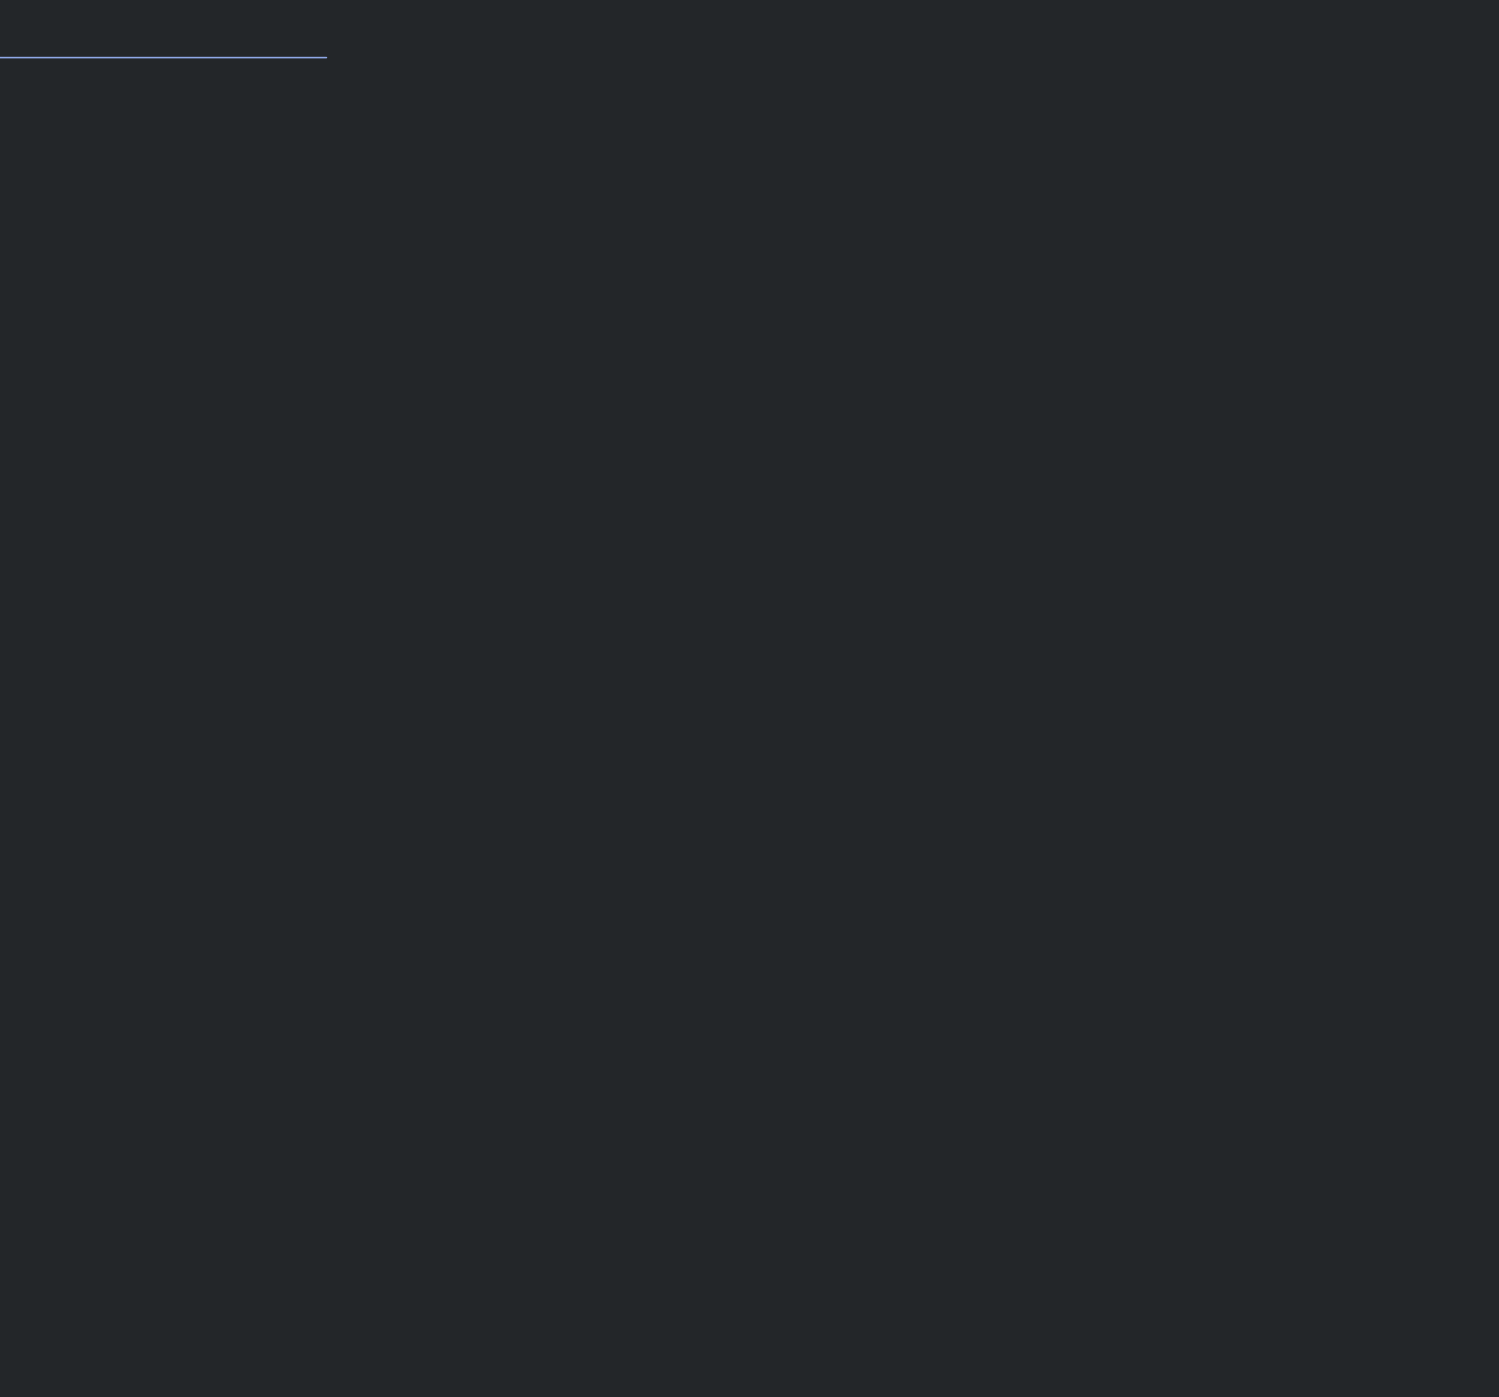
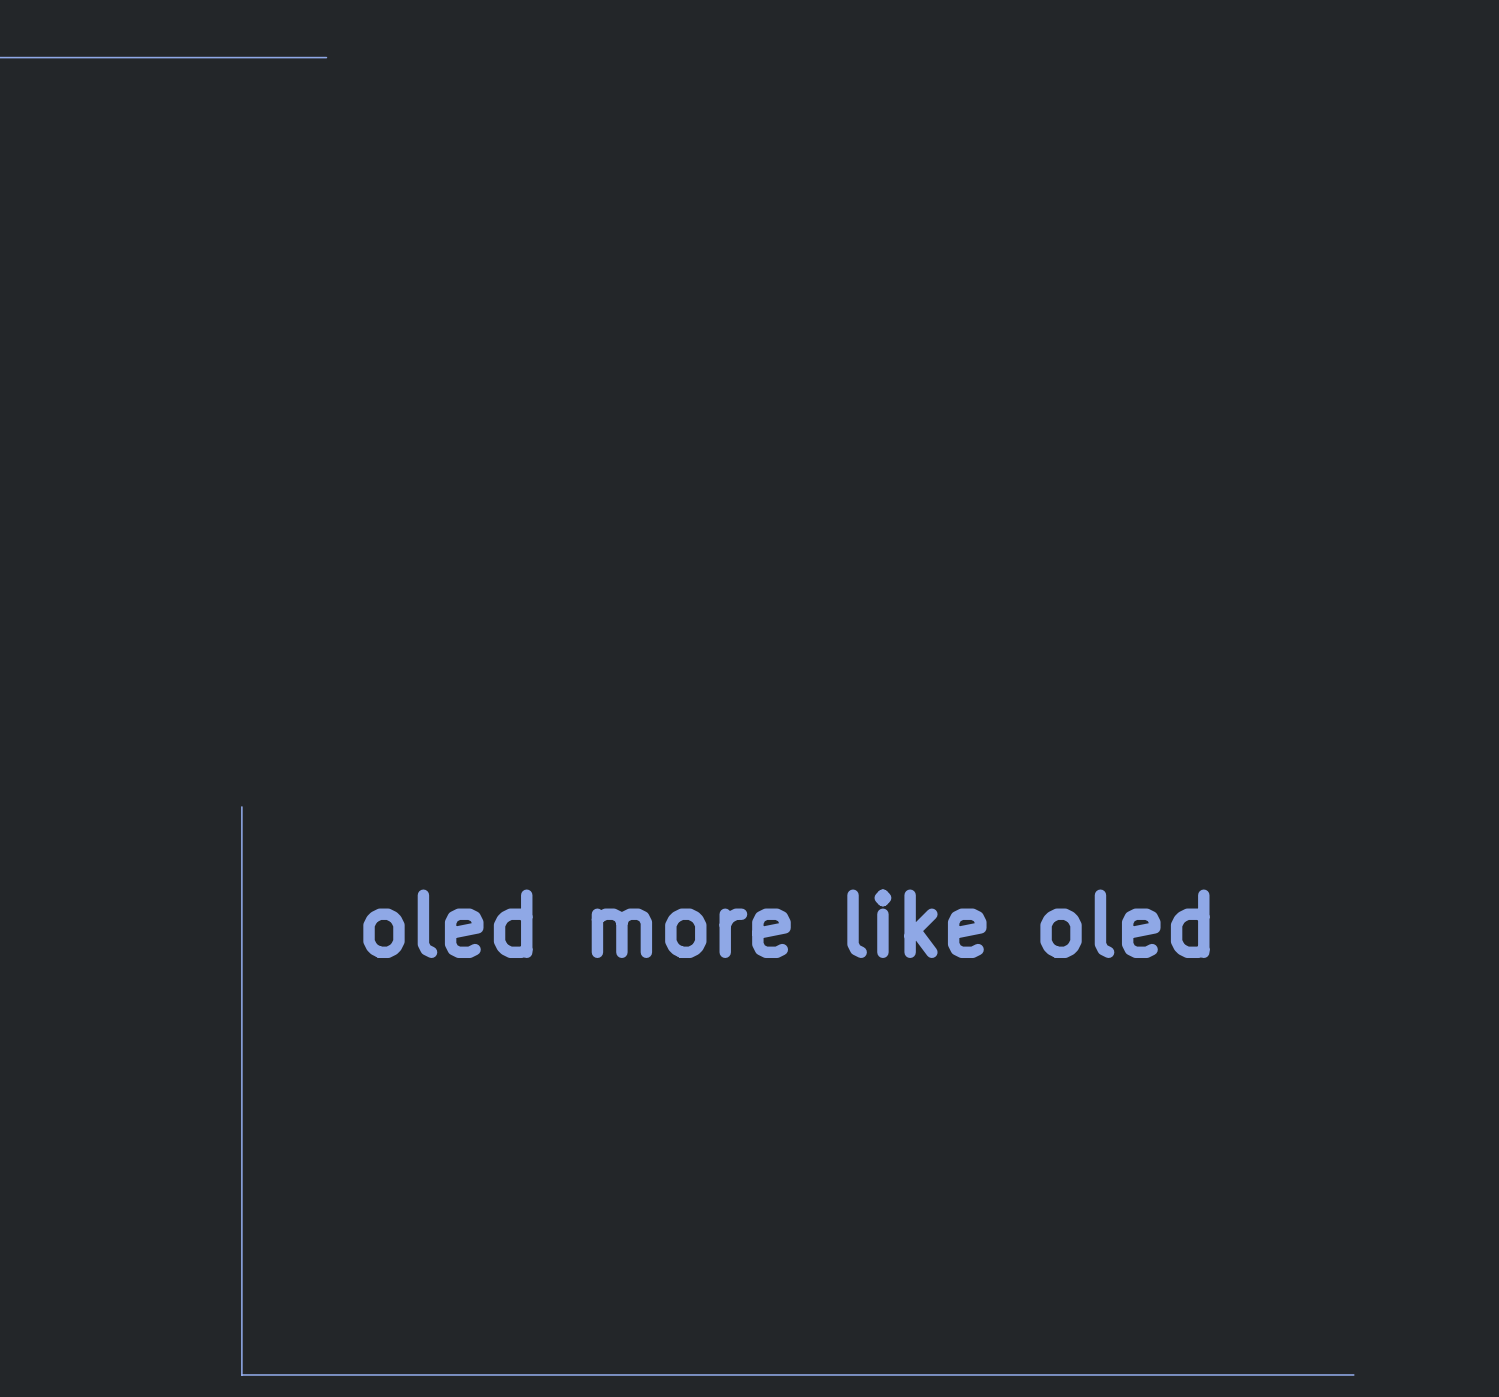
line: none -> (241, 806) (241, 1374) (1353, 1374)
text: none -> oled more like oled (786, 923)

